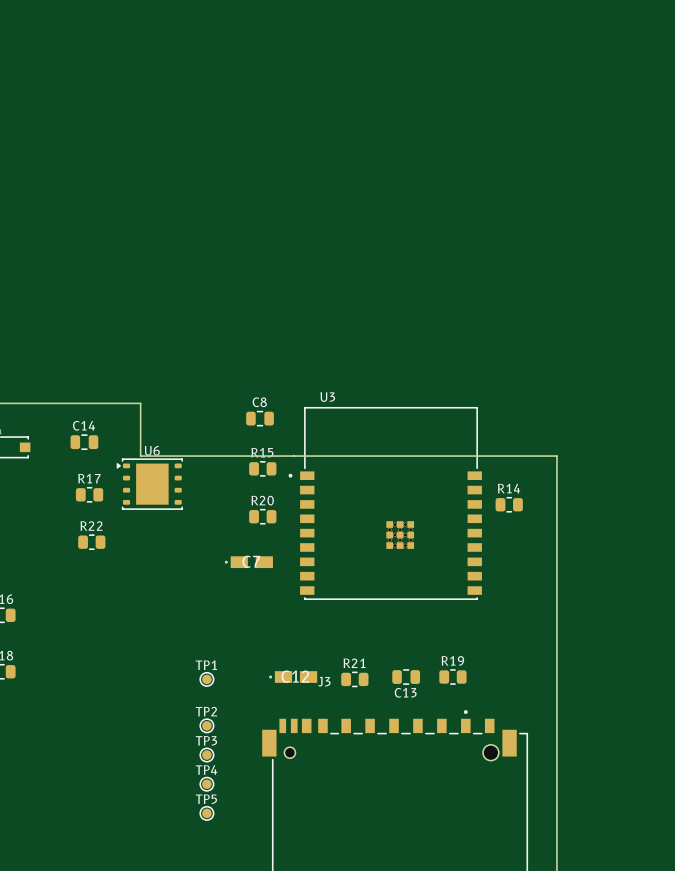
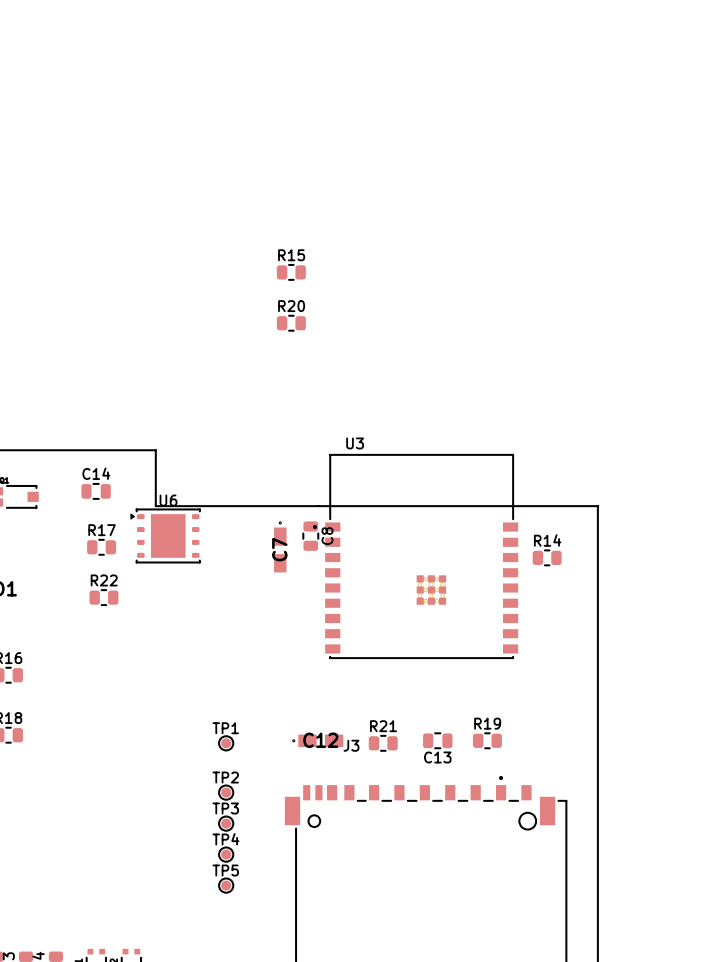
C8 rotation: 0° (260, 418) -> 90° clockwise (310, 536)
C8 position: (260, 418) -> (310, 536)
R15 position: (262, 468) -> (291, 272)
R20 position: (262, 516) -> (291, 323)
C7 rotation: 0° (248, 562) -> 90° clockwise (280, 546)
C7 position: (248, 562) -> (280, 546)

